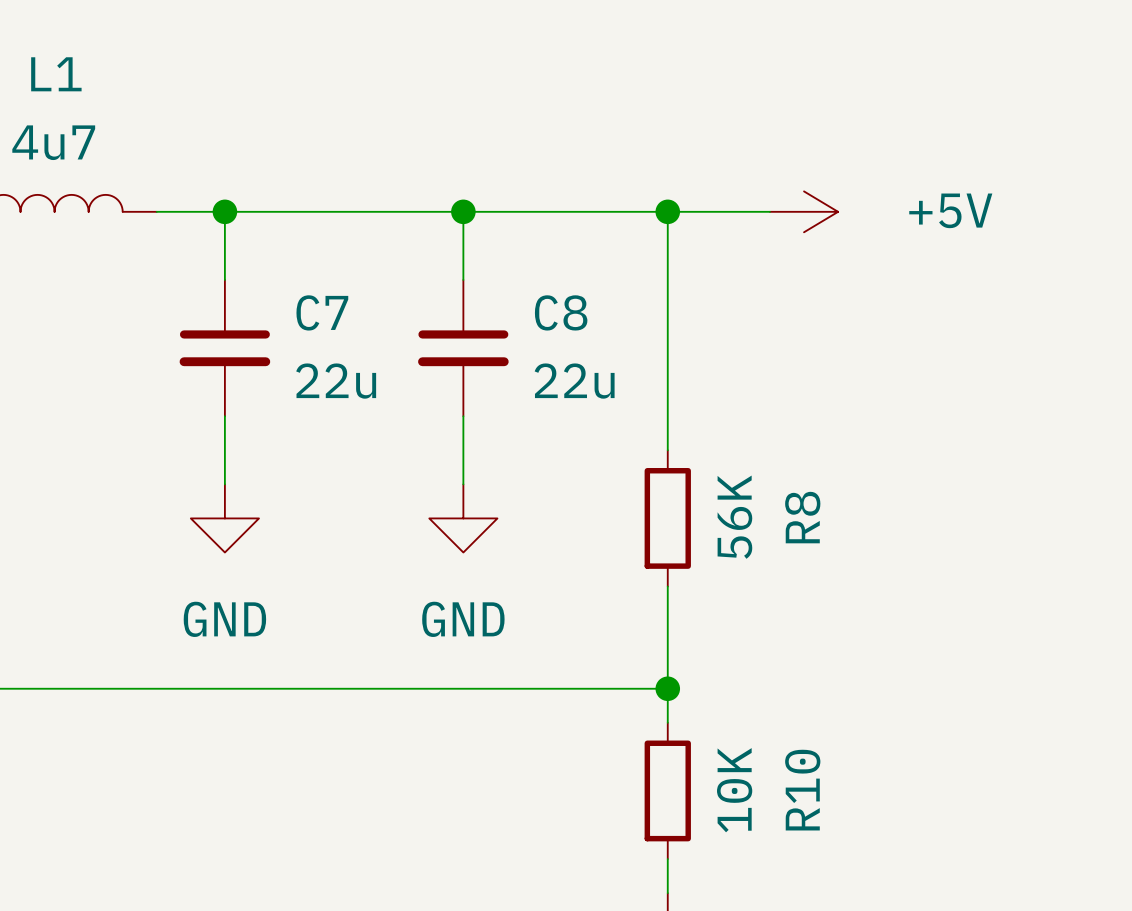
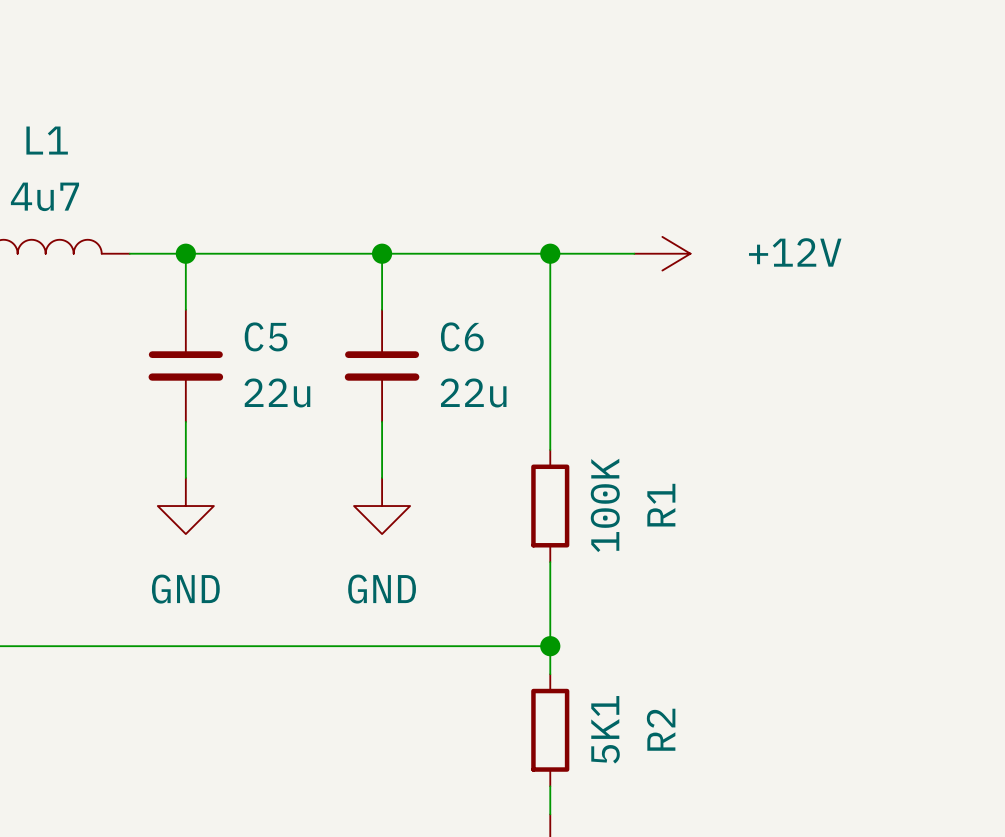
power symbol: +5V (804, 211) -> +12V (662, 253)
C7 name: C7 (322, 312) -> C5 (266, 336)
C8 name: C8 (561, 312) -> C6 (462, 336)
R8 value: 56K (734, 517) -> 100K (605, 505)
R8 name: R8 (802, 517) -> R1 (661, 505)
R10 value: 10K (734, 790) -> 5K1 (605, 729)
R10 name: R10 (802, 790) -> R2 (661, 729)

